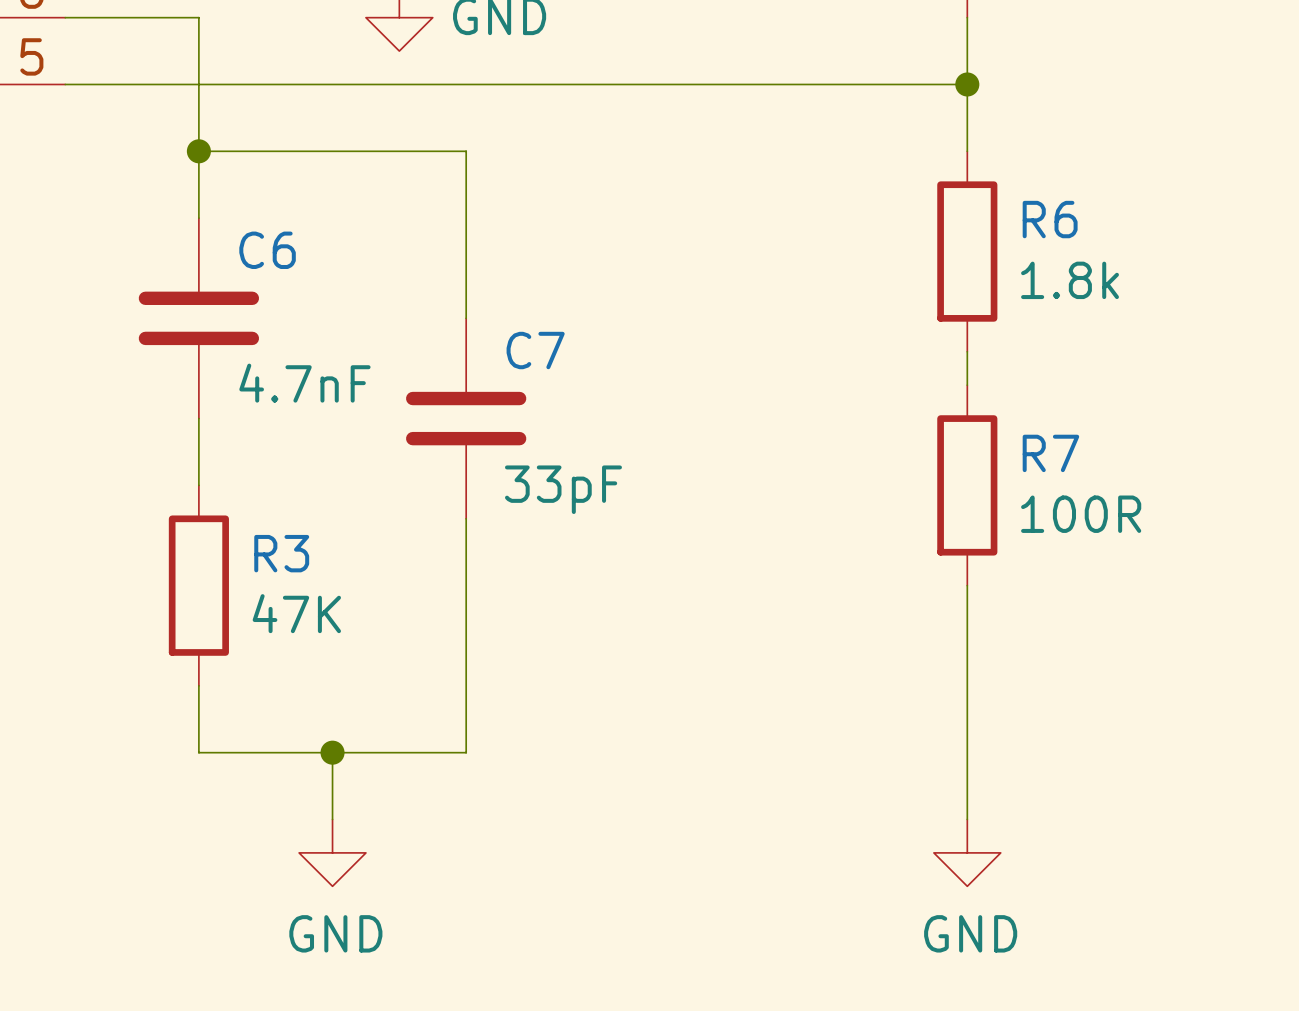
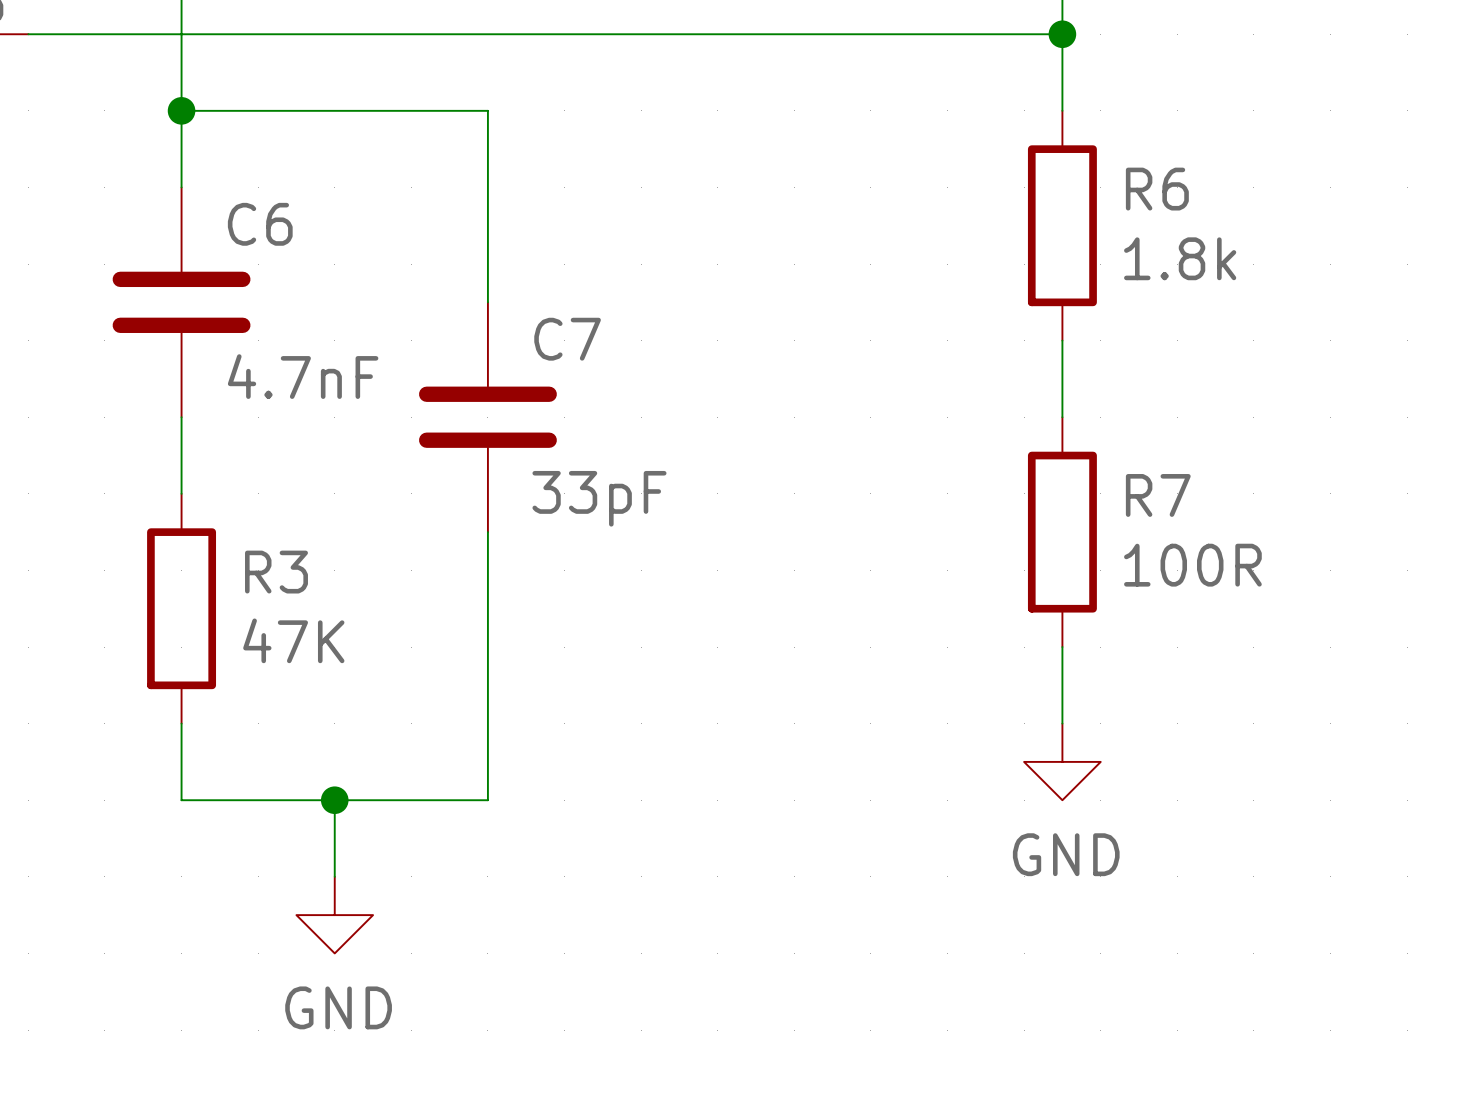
R7 position: (967, 485) -> (1062, 532)
wire: (967, 685) (967, 819) -> none
power symbol position: GND (967, 852) -> GND (1062, 761)

